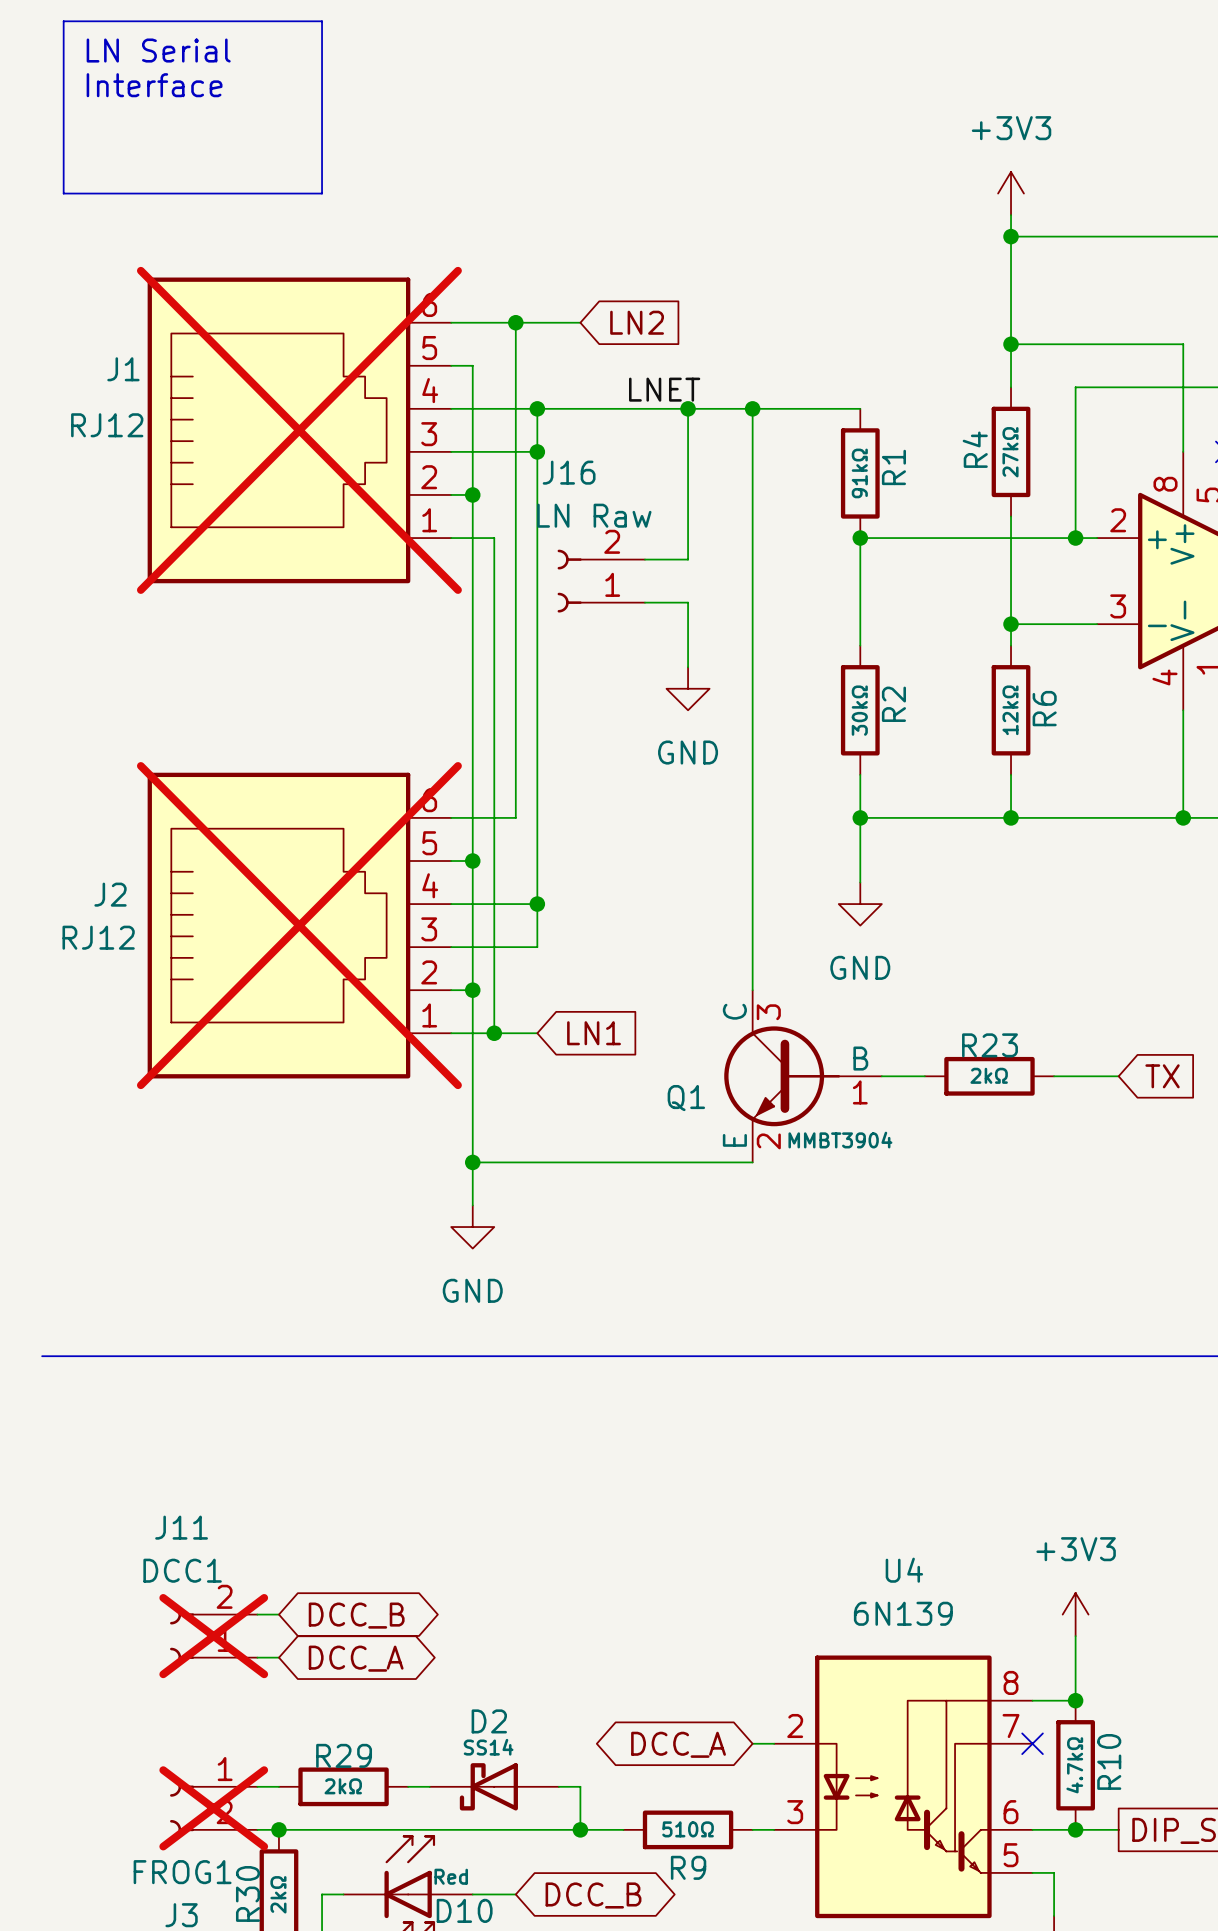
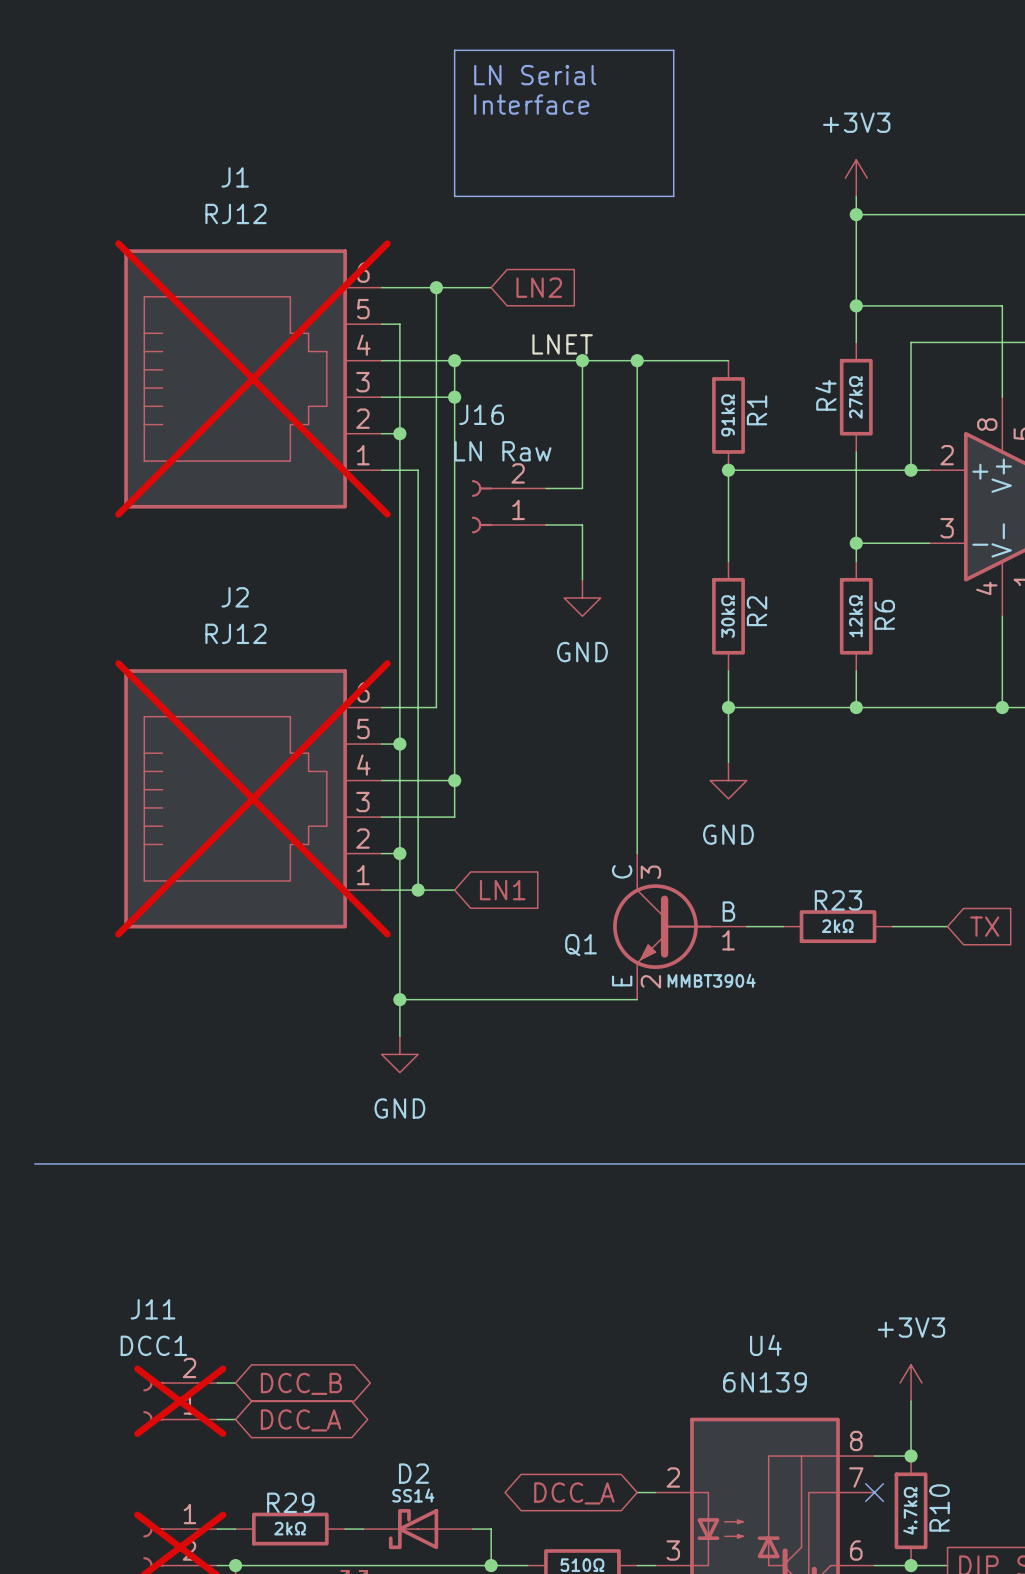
line: (63, 21) (322, 21) (322, 193) (63, 193) (63, 21) -> none
line: none -> (454, 50) (673, 50) (673, 196) (454, 196) (454, 50)
text: LN Serial (158, 50) -> none
text: none -> LN Serial (535, 75)
text: Interface (154, 85) -> none
text: none -> Interface (531, 104)
J1 name position: J1 (123, 369) -> J1 (235, 177)
J1 value position: RJ12 (107, 425) -> RJ12 (236, 213)
J2 name position: J2 (110, 894) -> J2 (235, 597)
J2 value position: RJ12 (98, 937) -> RJ12 (236, 633)

